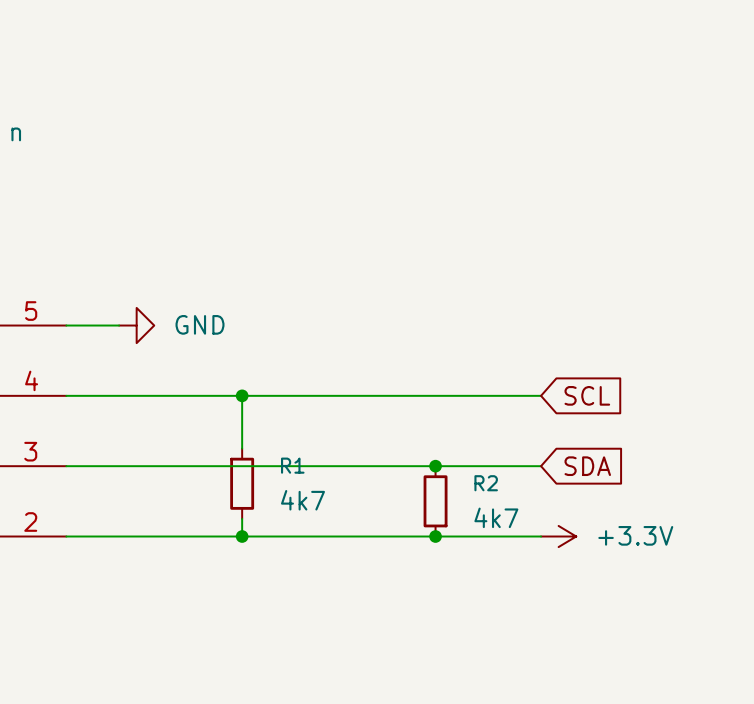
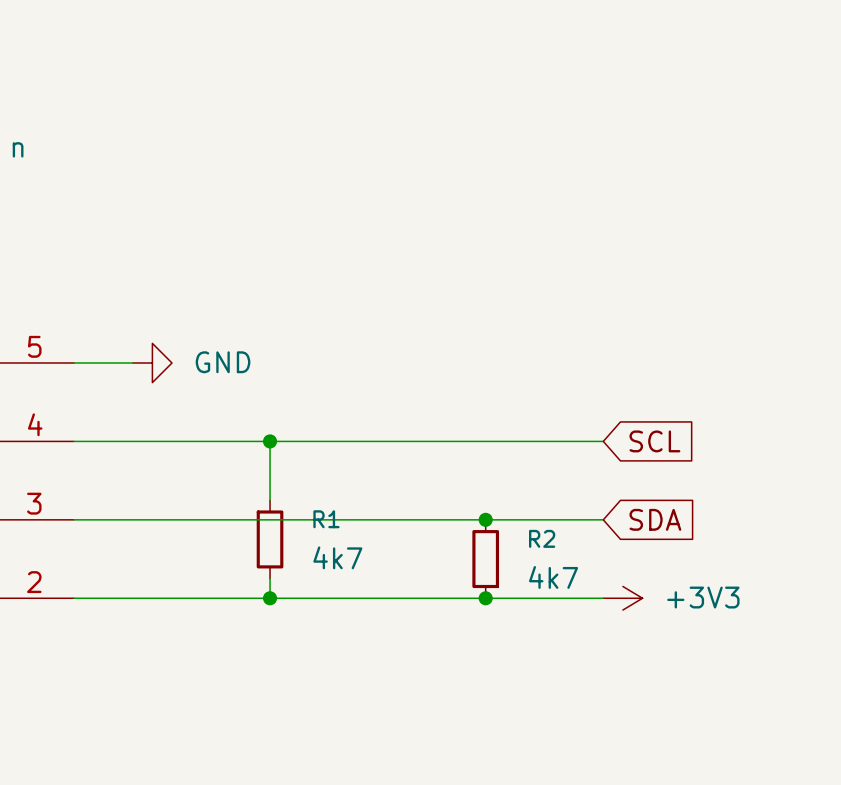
power symbol: +3.3V (558, 536) -> +3V3 (622, 598)

